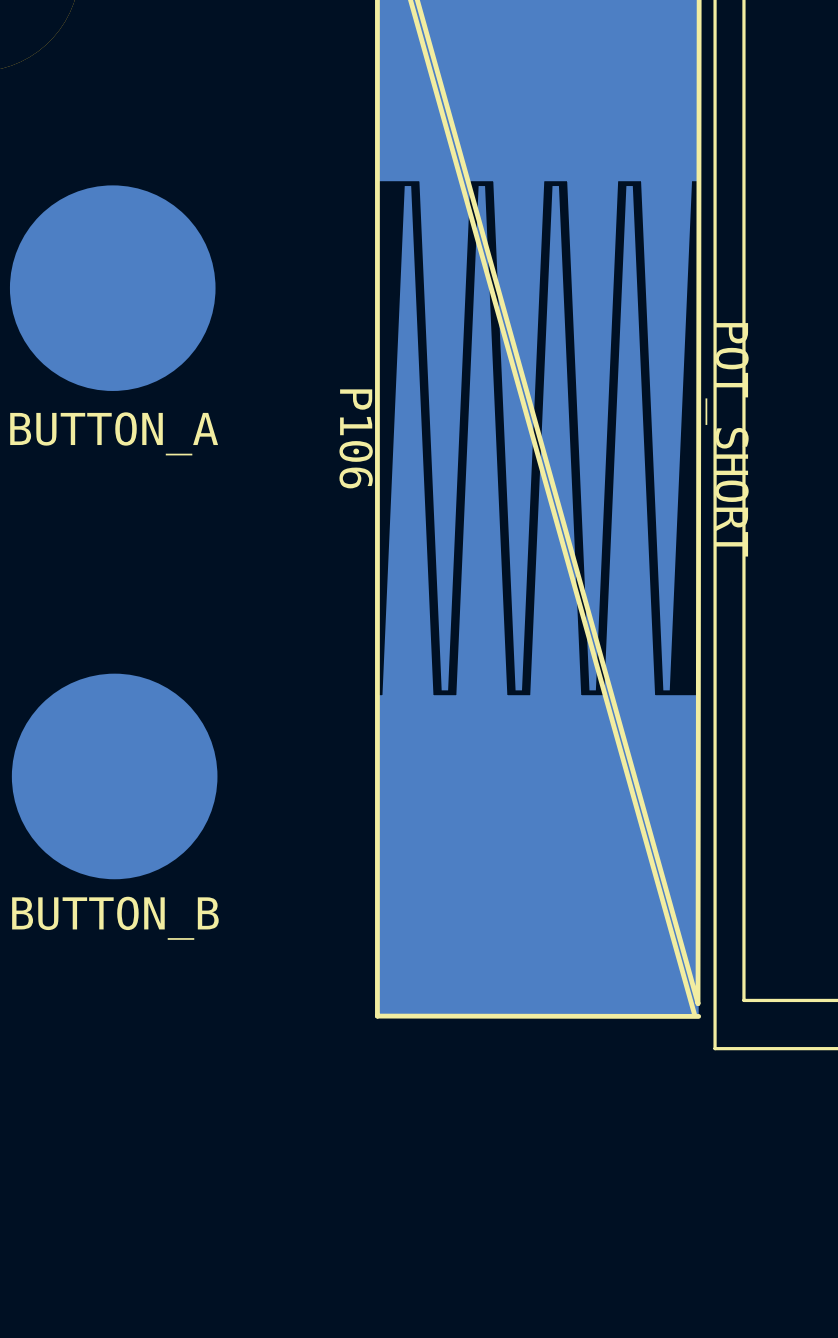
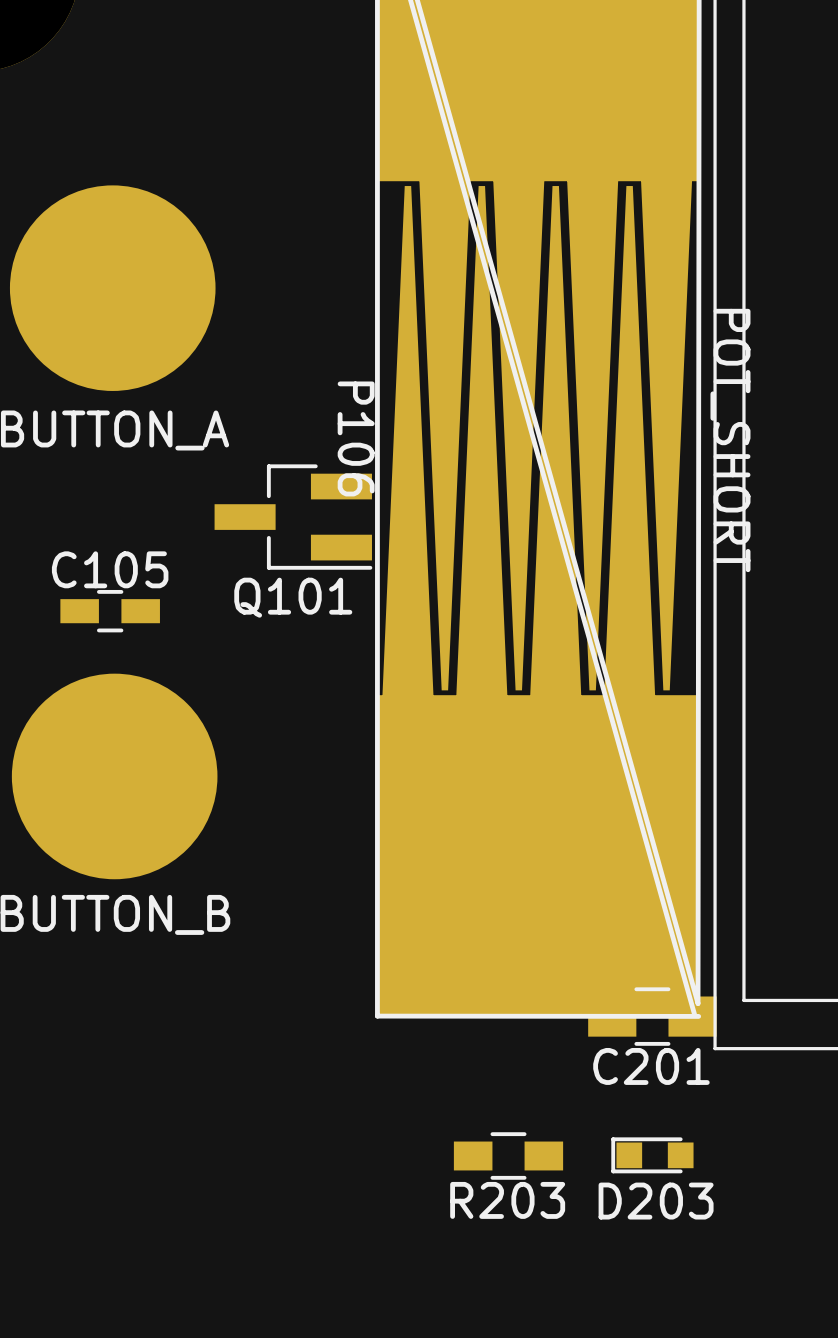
Q101: none -> (293, 517)
C105: none -> (110, 611)
C201: none -> (652, 1016)
R203: none -> (508, 1155)
D203: none -> (652, 1155)

